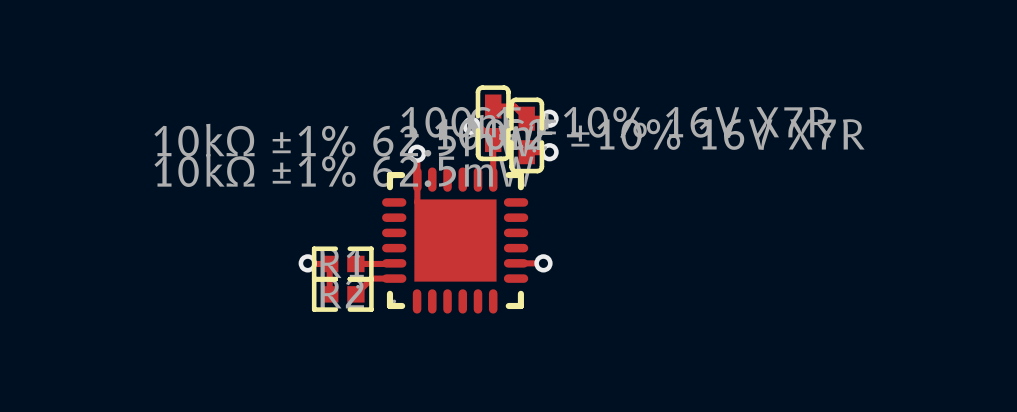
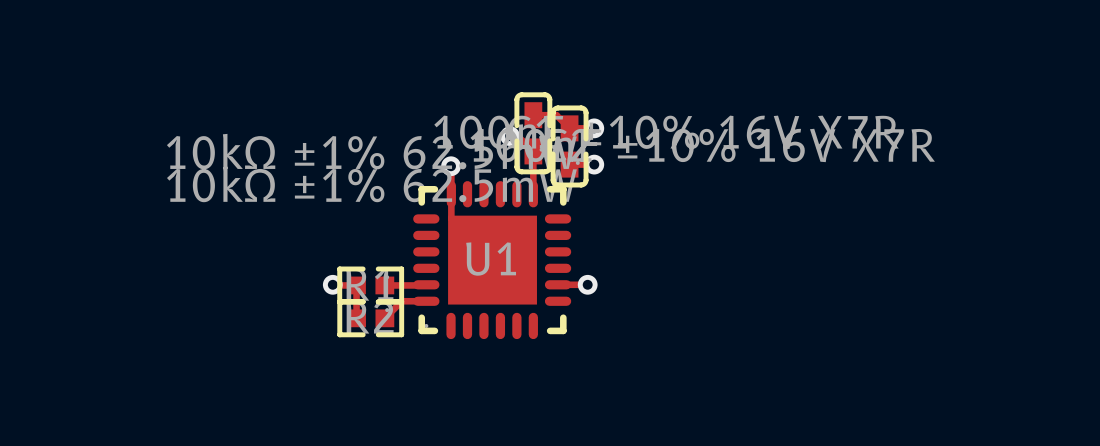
U1 name: none -> U1 (491, 259)

